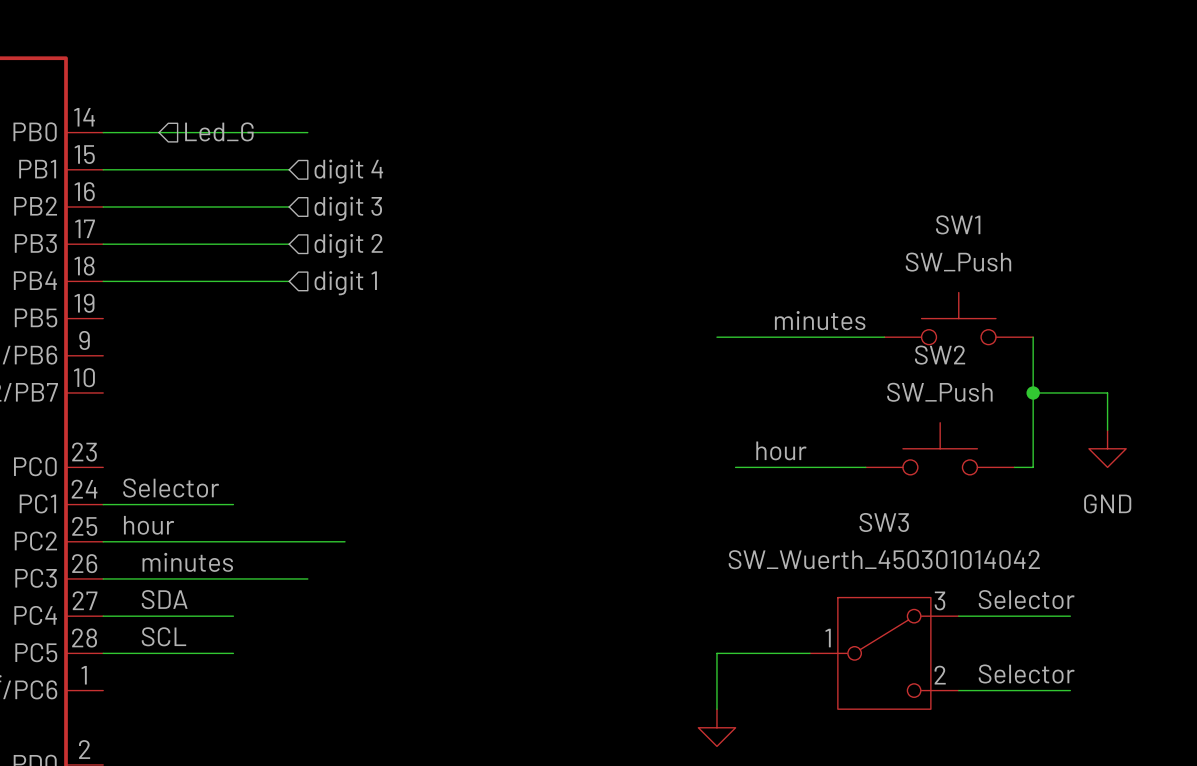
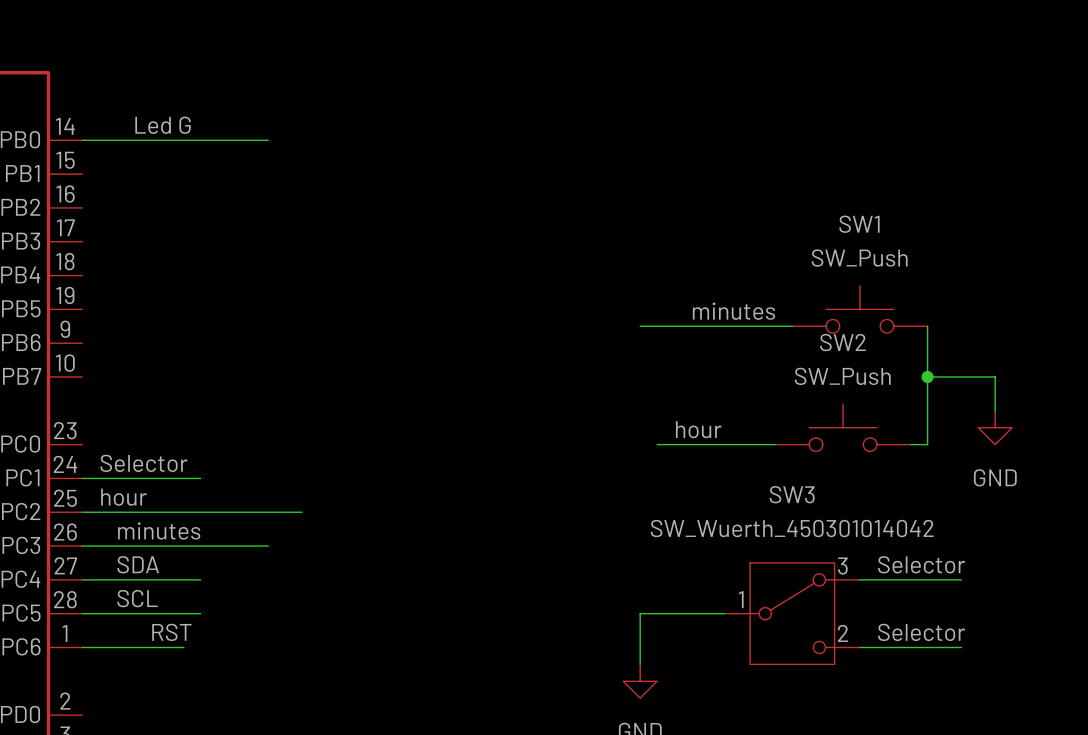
label: none -> Led G (163, 125)
hierarchical label: Led_G (219, 131) -> none
wire: (103, 169) (289, 169) -> none
hierarchical label: digit 4 (348, 171) -> none
wire: (103, 206) (289, 206) -> none
hierarchical label: digit 3 (348, 208) -> none
wire: (103, 244) (289, 244) -> none
hierarchical label: digit 2 (348, 246) -> none
wire: (103, 281) (289, 281) -> none
hierarchical label: digit 1 (345, 283) -> none
label: none -> RST (171, 632)
wire: none -> (82, 647) (183, 647)

